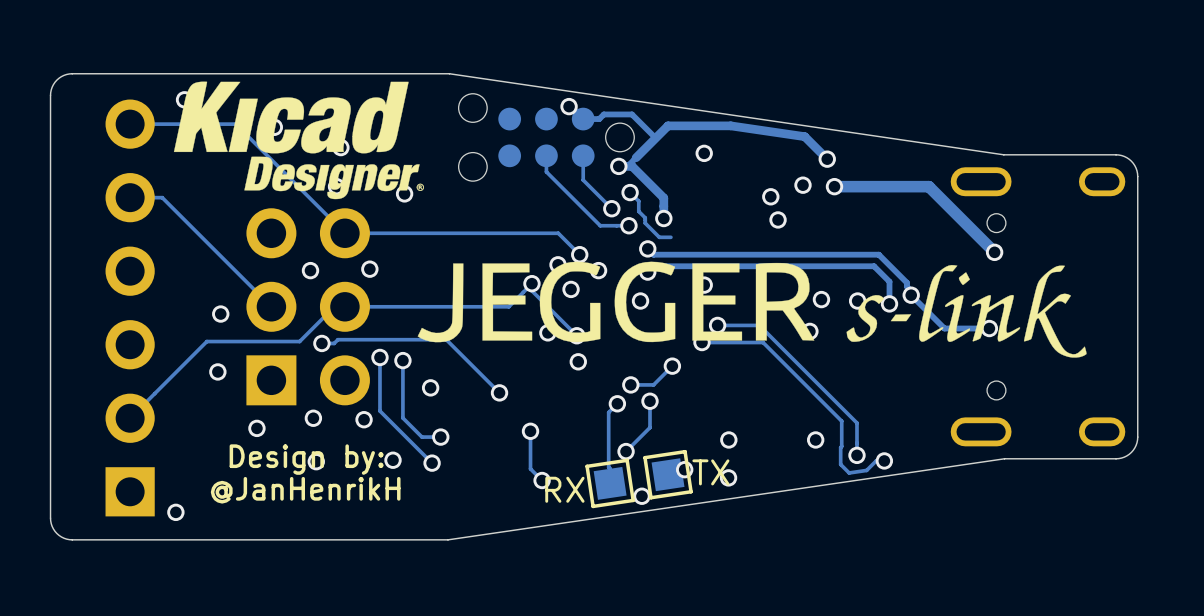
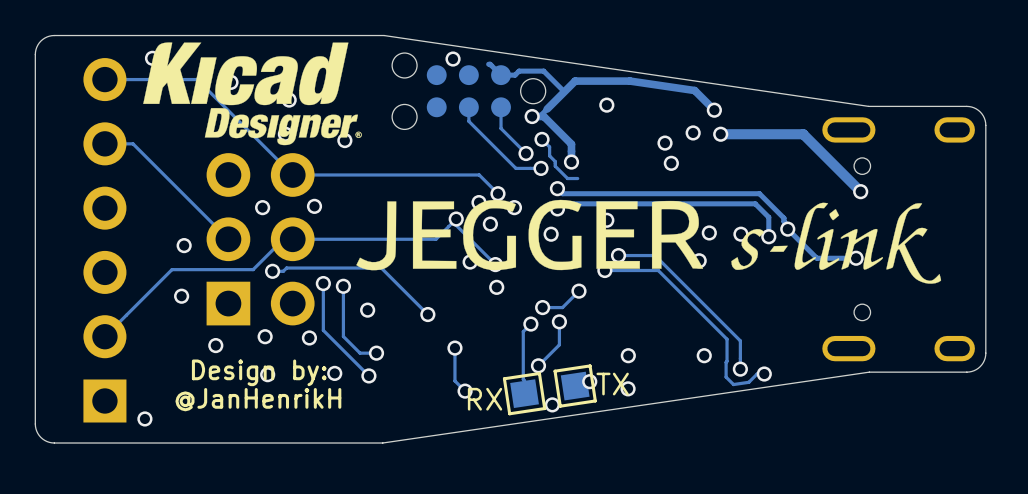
via position: (569, 106) -> (453, 59)

